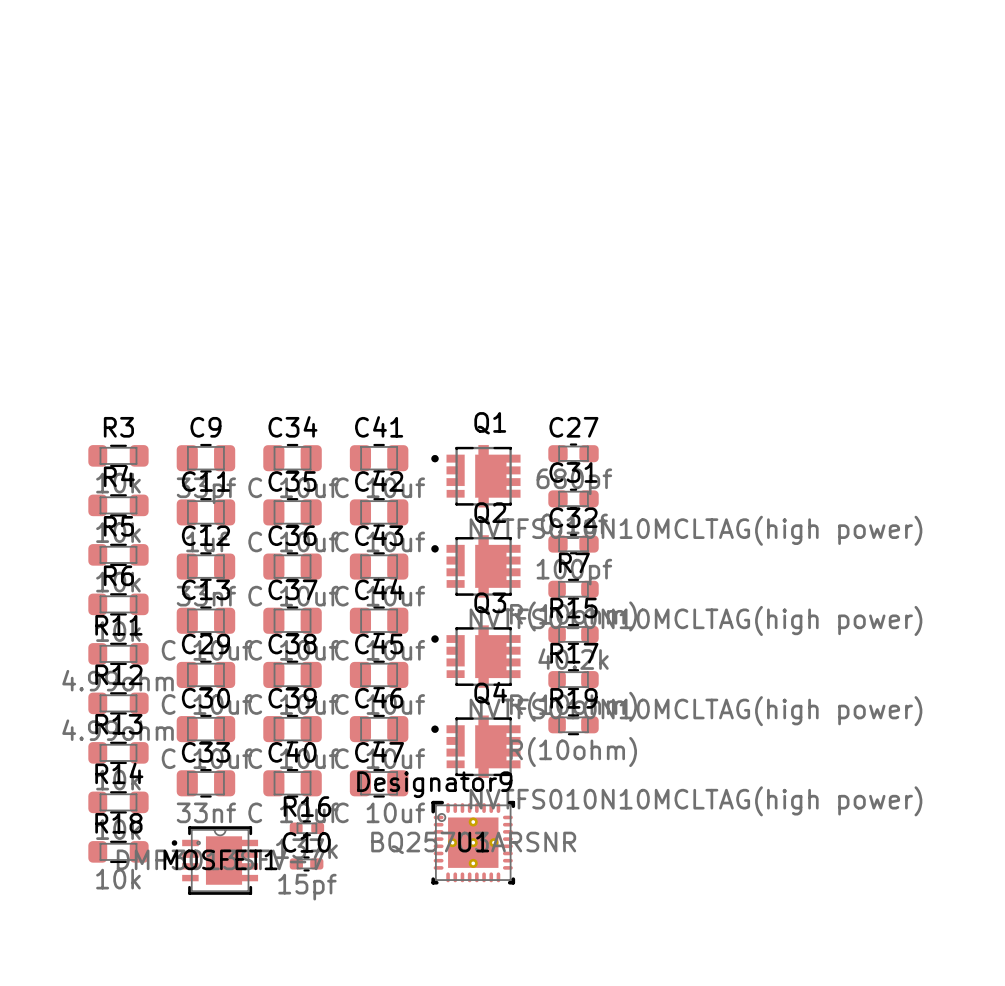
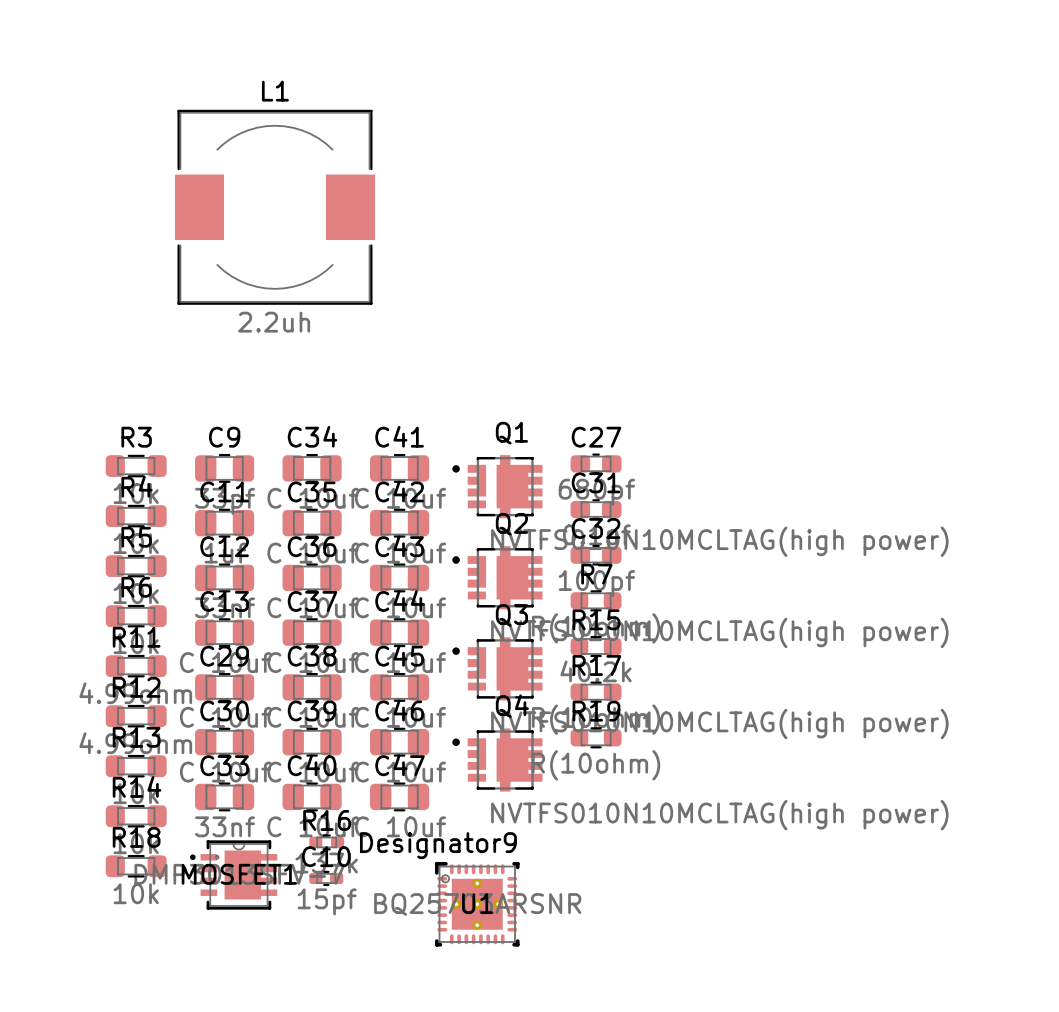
L1: none -> 2.2uh (274, 207)
U1 position: (473, 842) -> (477, 904)

